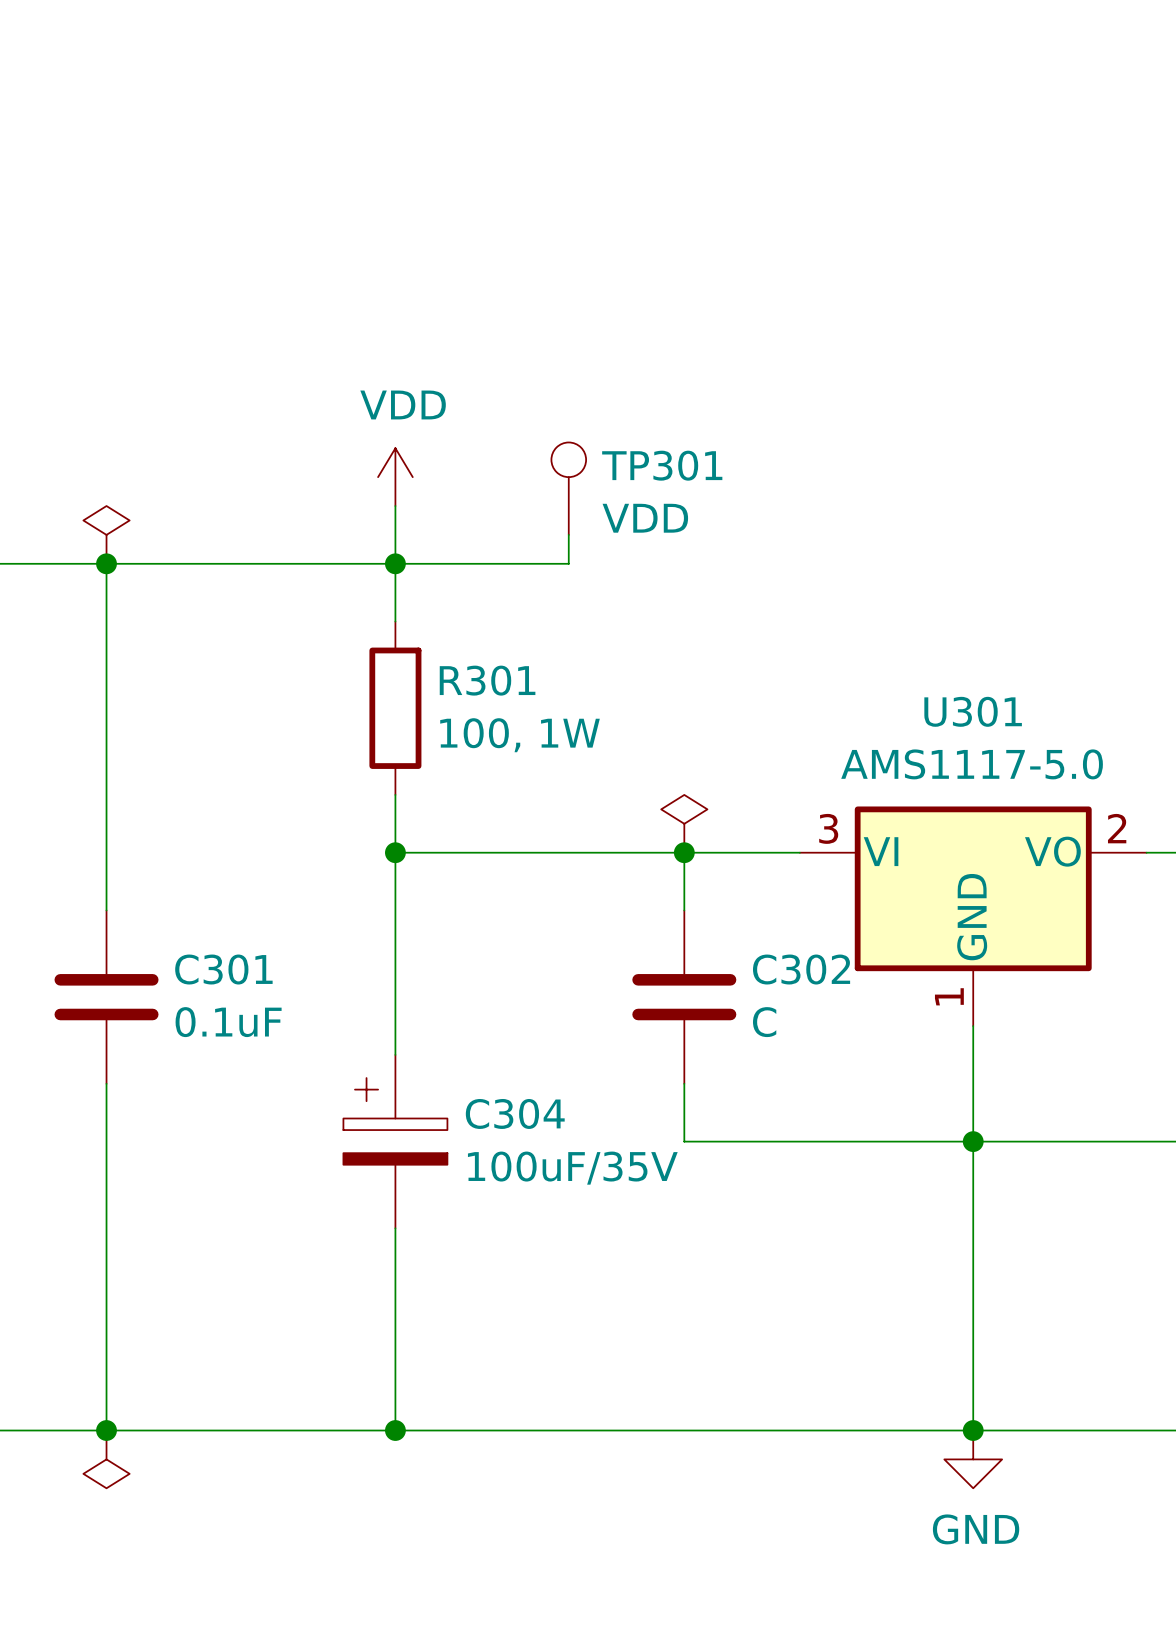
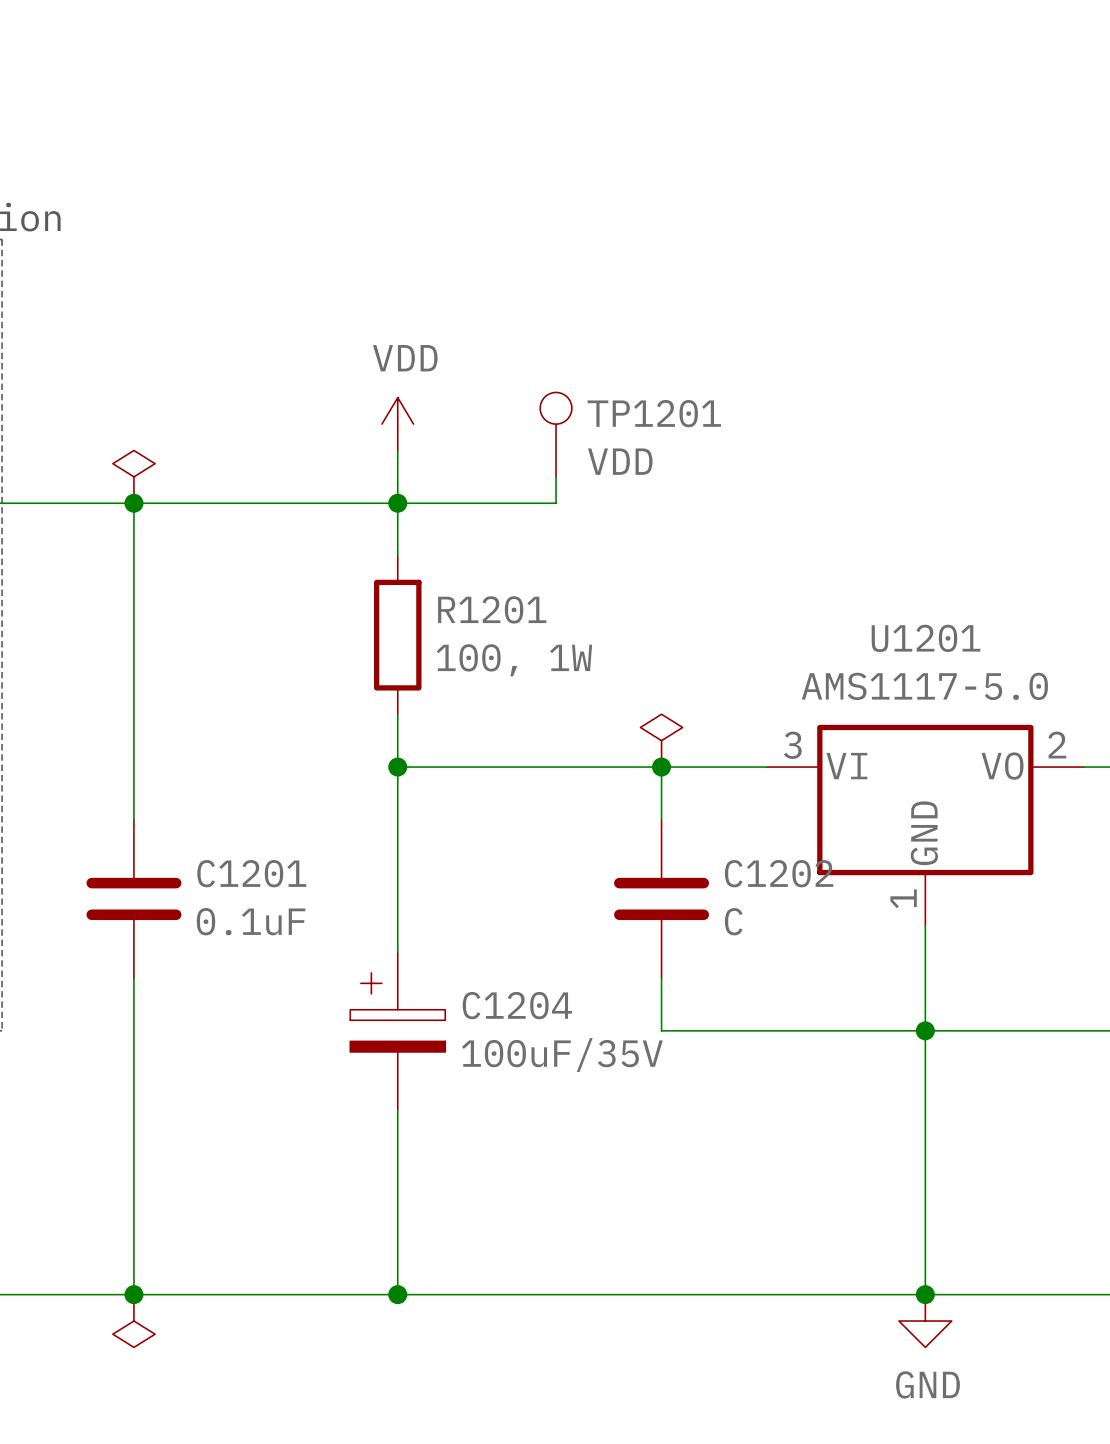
TP301 name: TP301 (662, 465) -> TP1201 (654, 413)
R301 name: R301 (487, 680) -> R1201 (492, 609)
U301 name: U301 (973, 711) -> U1201 (925, 638)
C301 name: C301 (223, 969) -> C1201 (251, 873)
C302 name: C302 (801, 969) -> C1202 (779, 873)
C304 name: C304 (515, 1113) -> C1204 (517, 1005)

